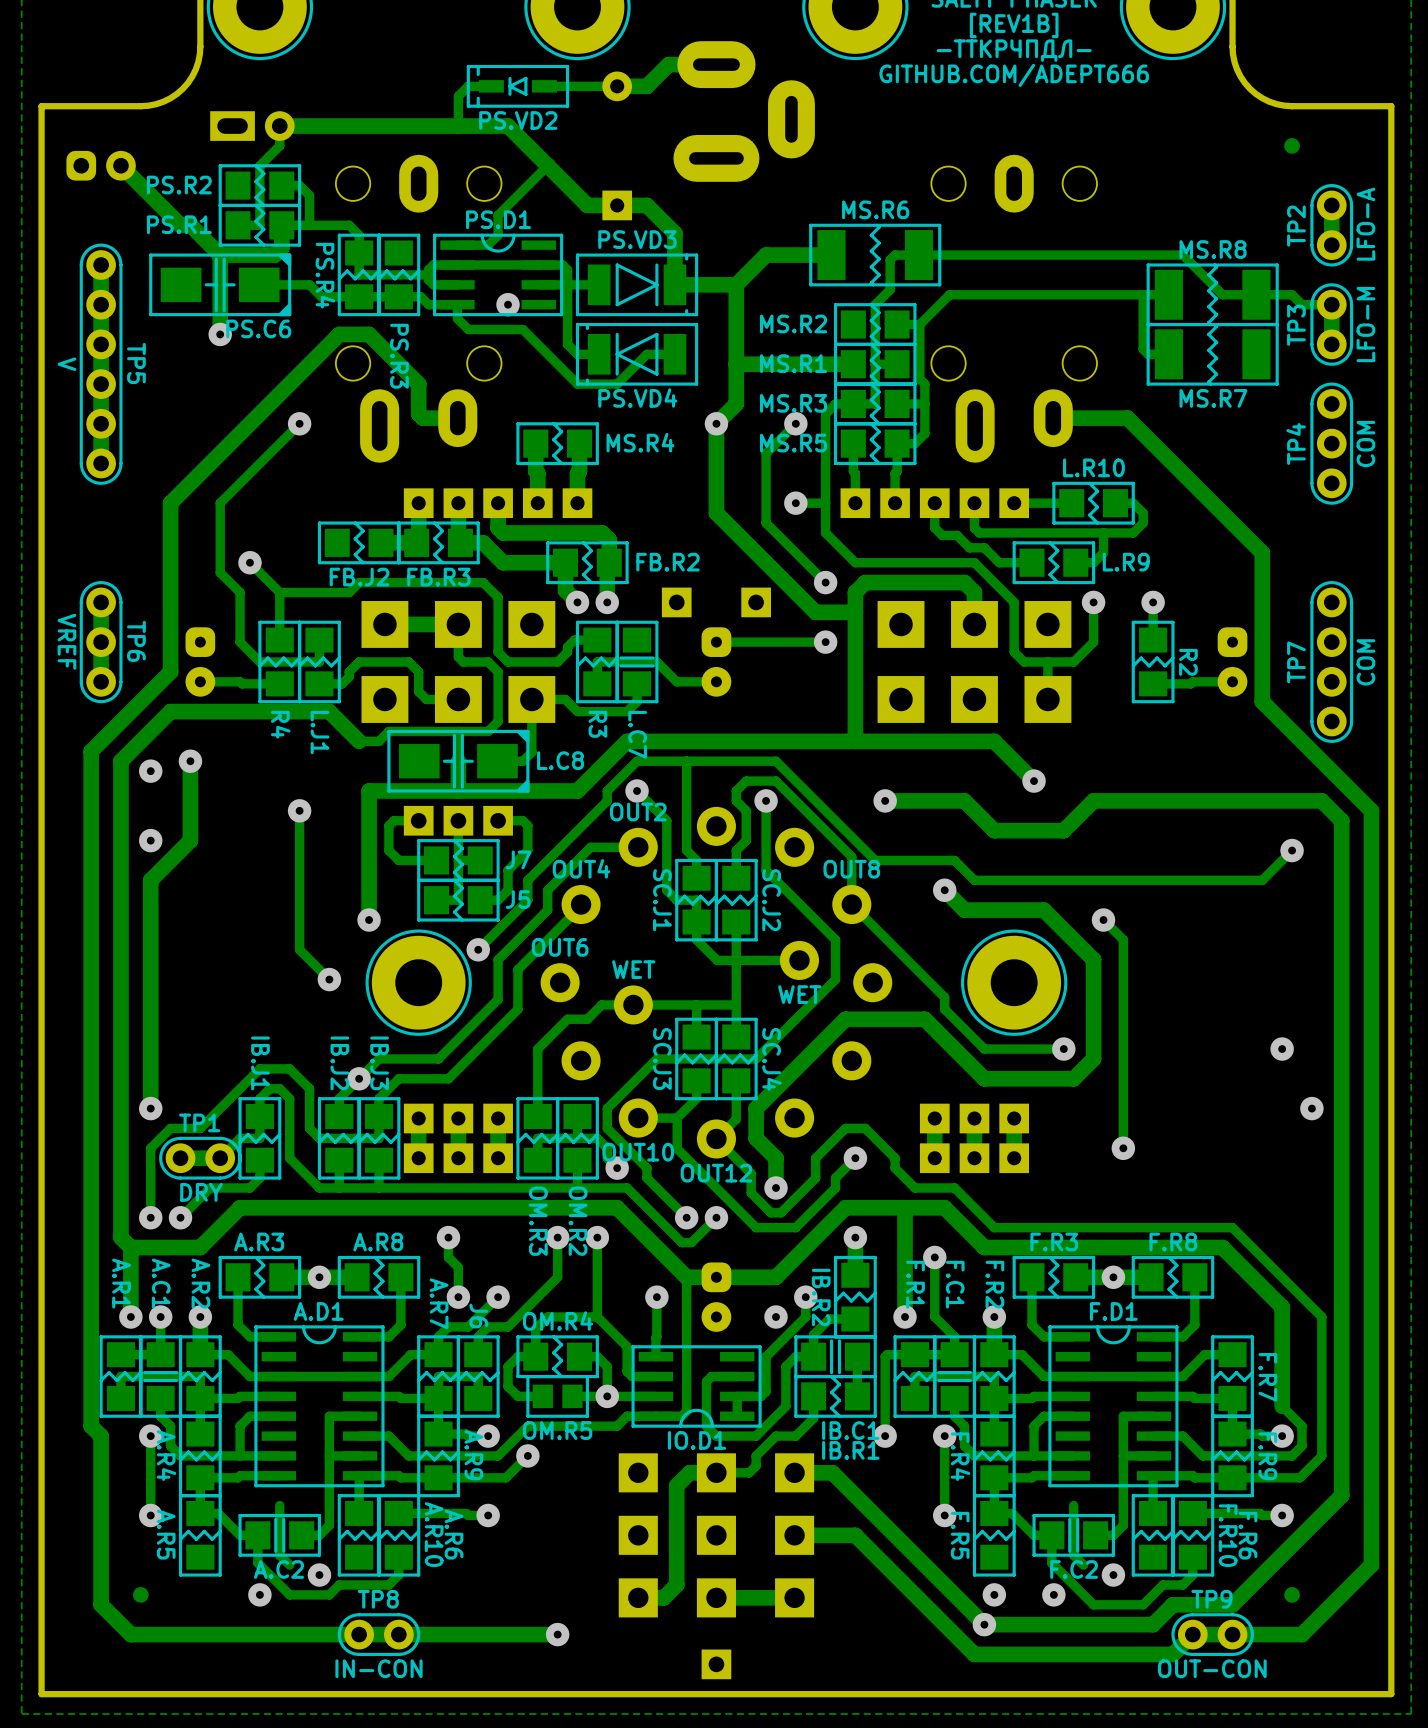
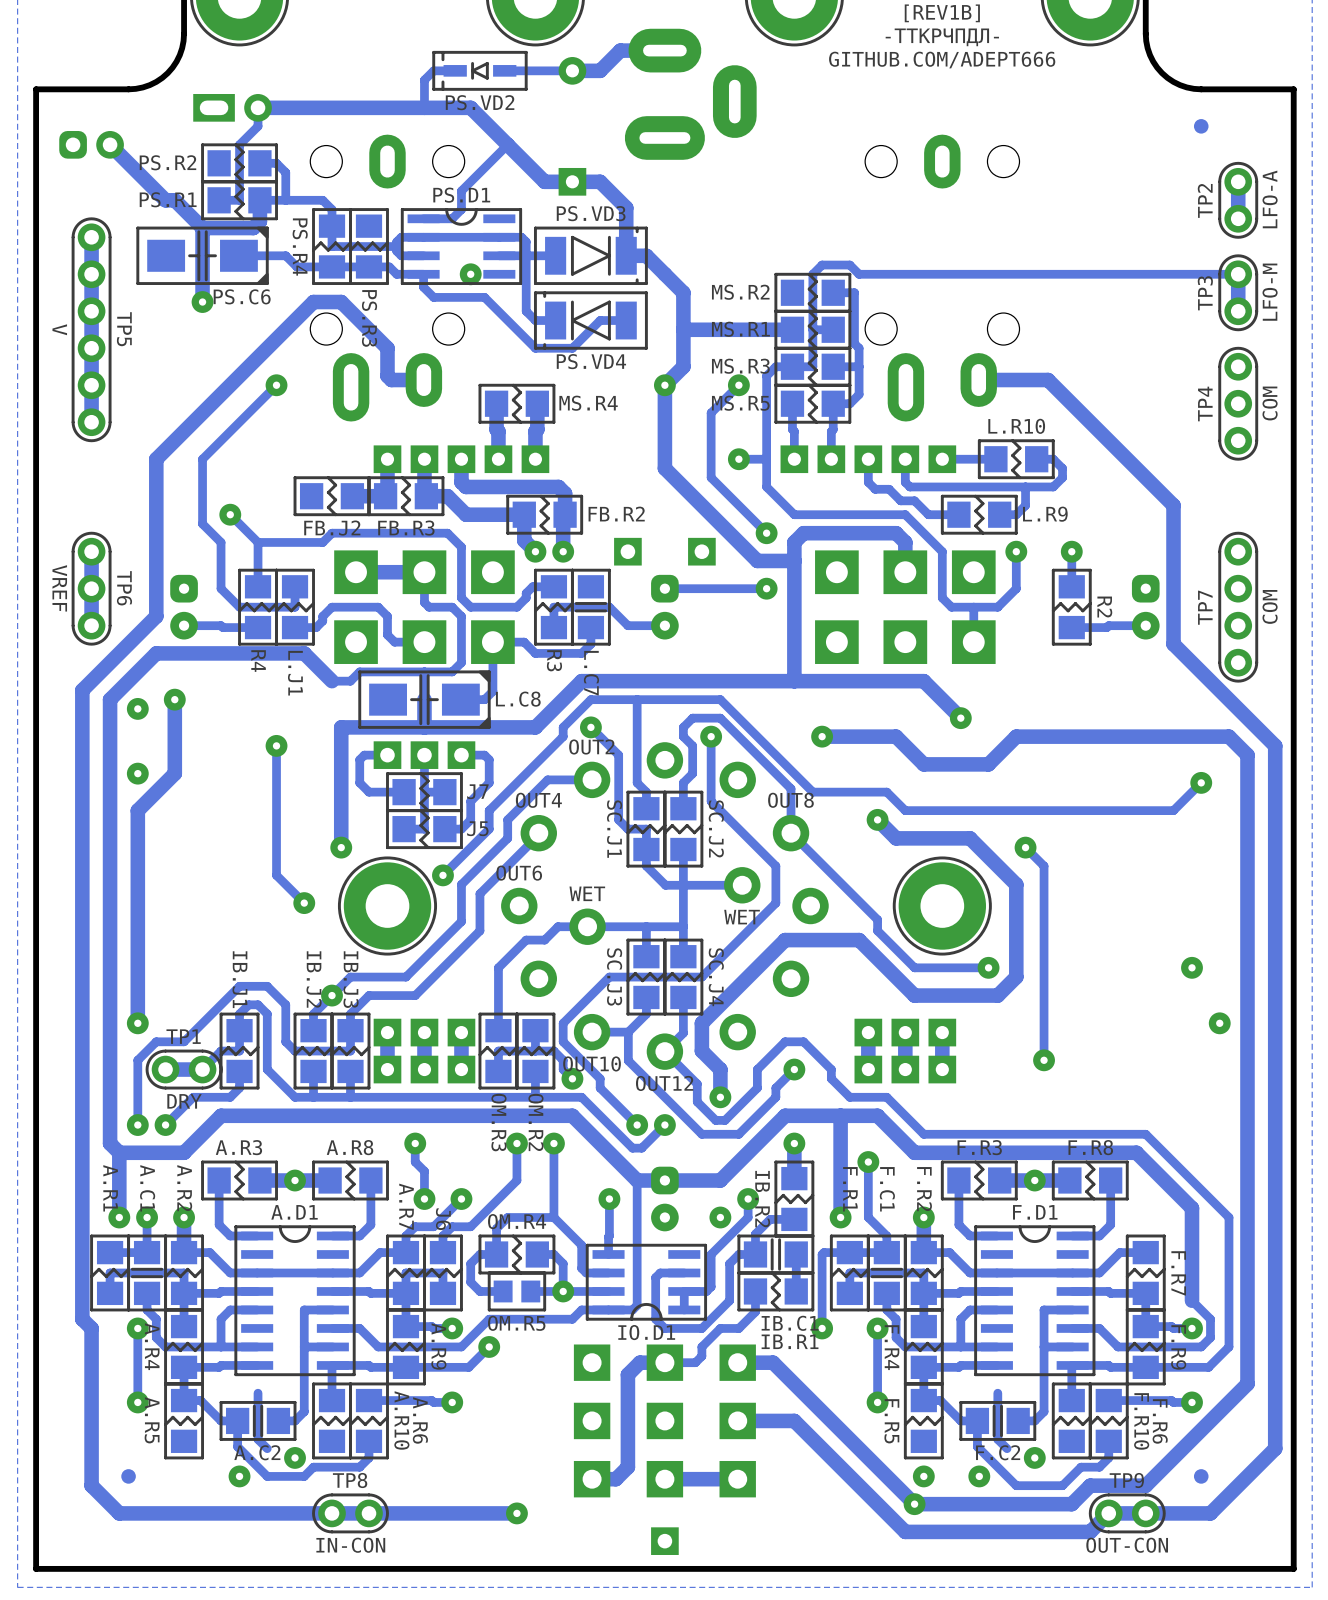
track: (831, 255) (766, 255) (736, 284) -> none
MS.R6: (875, 255) -> none
track: (736, 284) (736, 324) -> (646, 255) (683, 292)
track: (736, 284) (696, 284) -> none
track: (885, 294) (890, 289) (890, 260) (895, 255) (1182, 255) (1222, 294) (1292, 294) (1301, 304) -> (822, 265) (849, 265) (859, 274) (1210, 274)
track: (1143, 294) (1143, 349) (1148, 354) (1168, 354) -> none
track: (1168, 294) (949, 294) (919, 324) -> none
MS.R8: (1212, 294) -> none
MS.R7: (1212, 354) -> none

